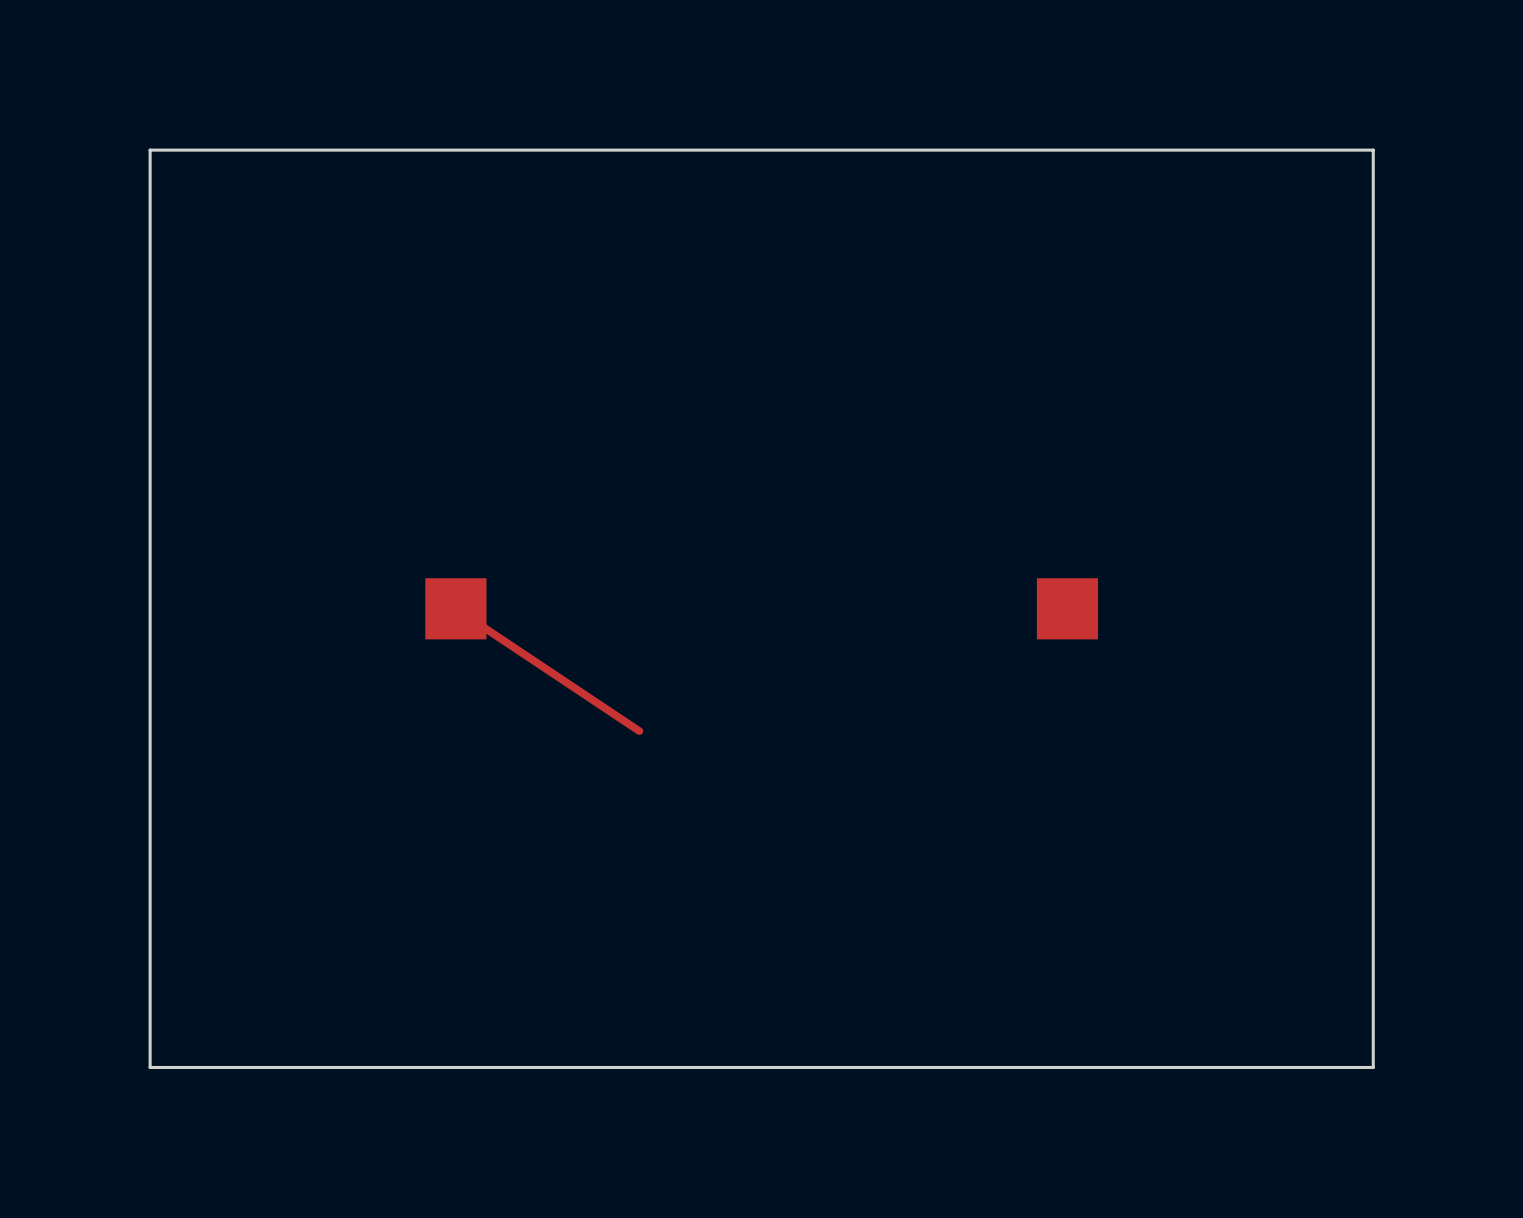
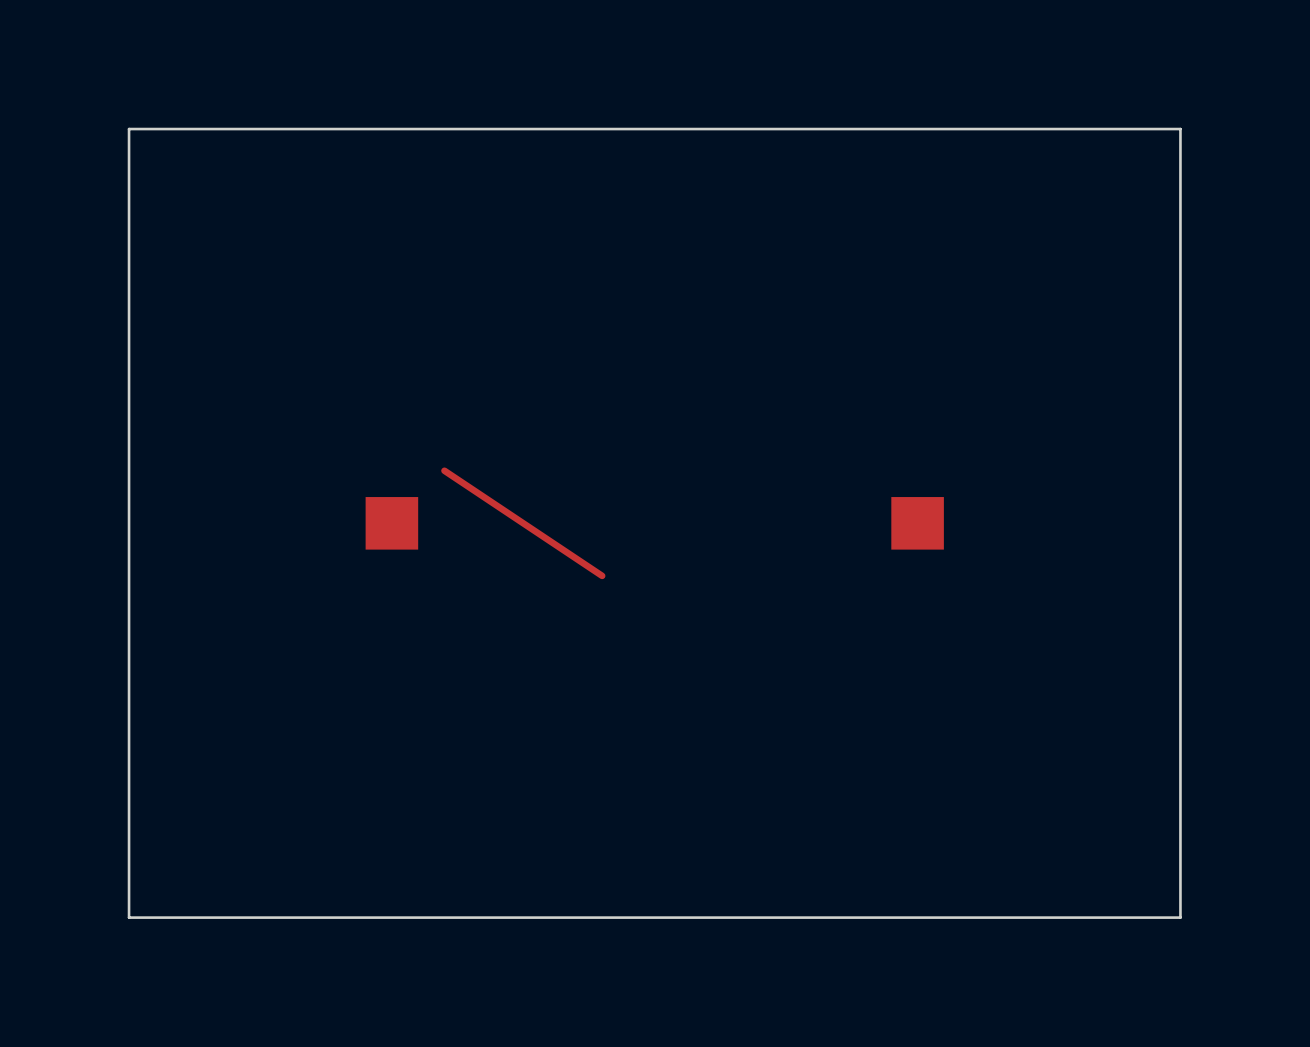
top track: (455, 608) (639, 731) -> (444, 470) (602, 575)

